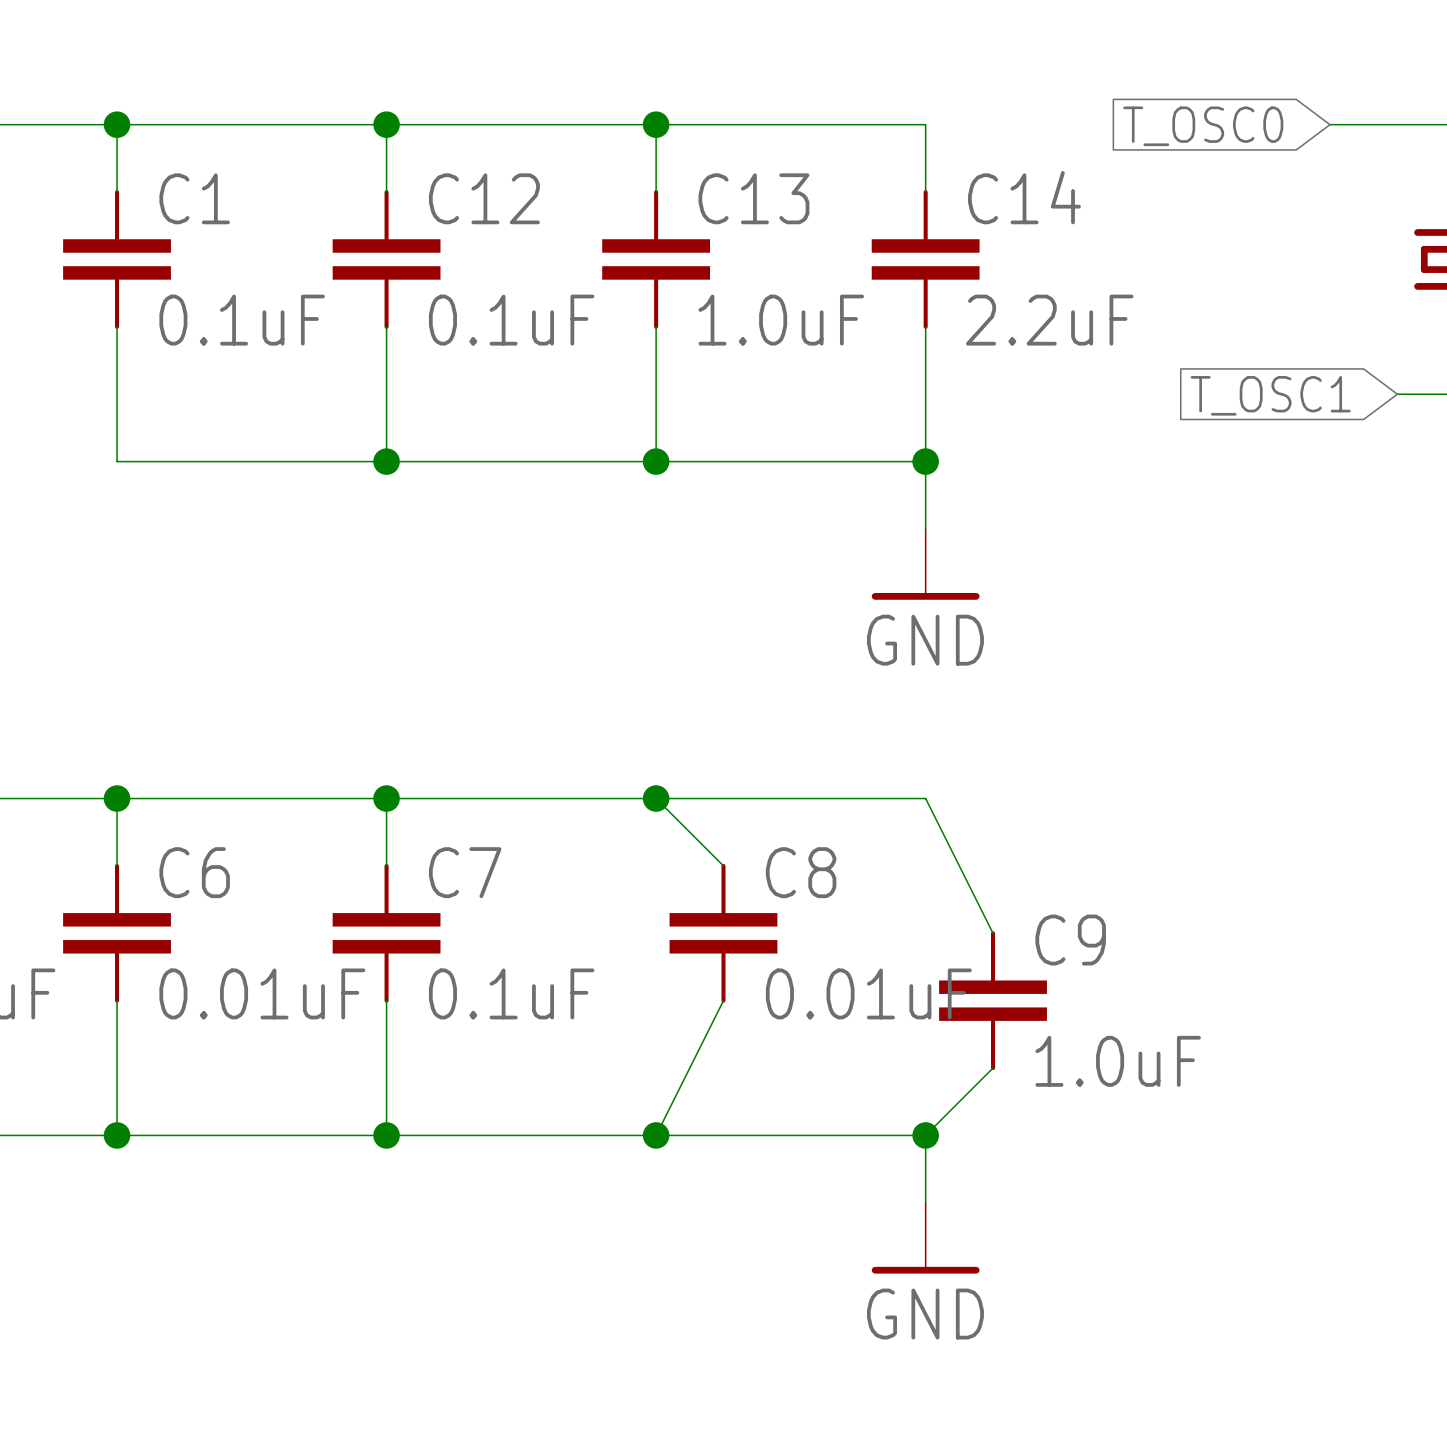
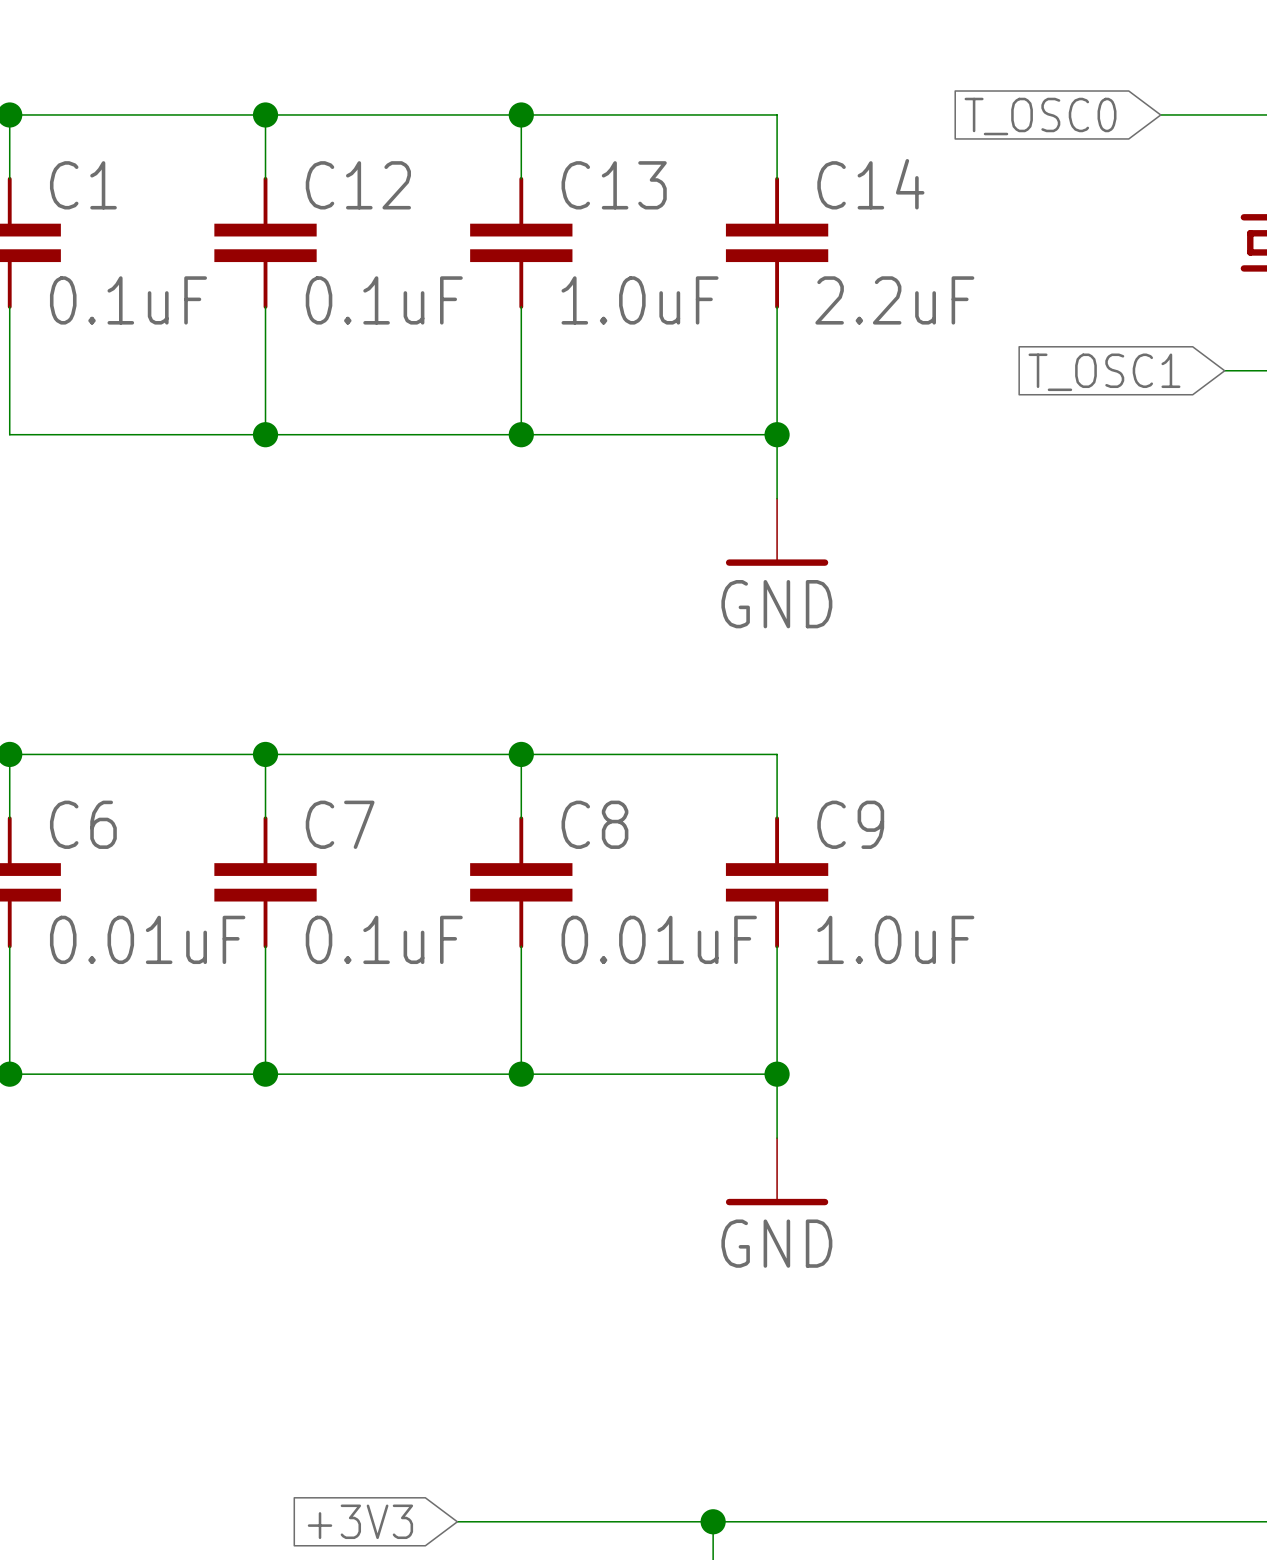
wire: (656, 798) (723, 865) -> (521, 754) (521, 818)
wire: (925, 798) (993, 933) -> (777, 754) (777, 818)
C8 position: (723, 933) -> (521, 882)
wire: (723, 1000) (656, 1135) -> (521, 946) (521, 1074)
C9 position: (993, 1000) -> (777, 882)
wire: (993, 1068) (925, 1135) -> (777, 946) (777, 1074)

